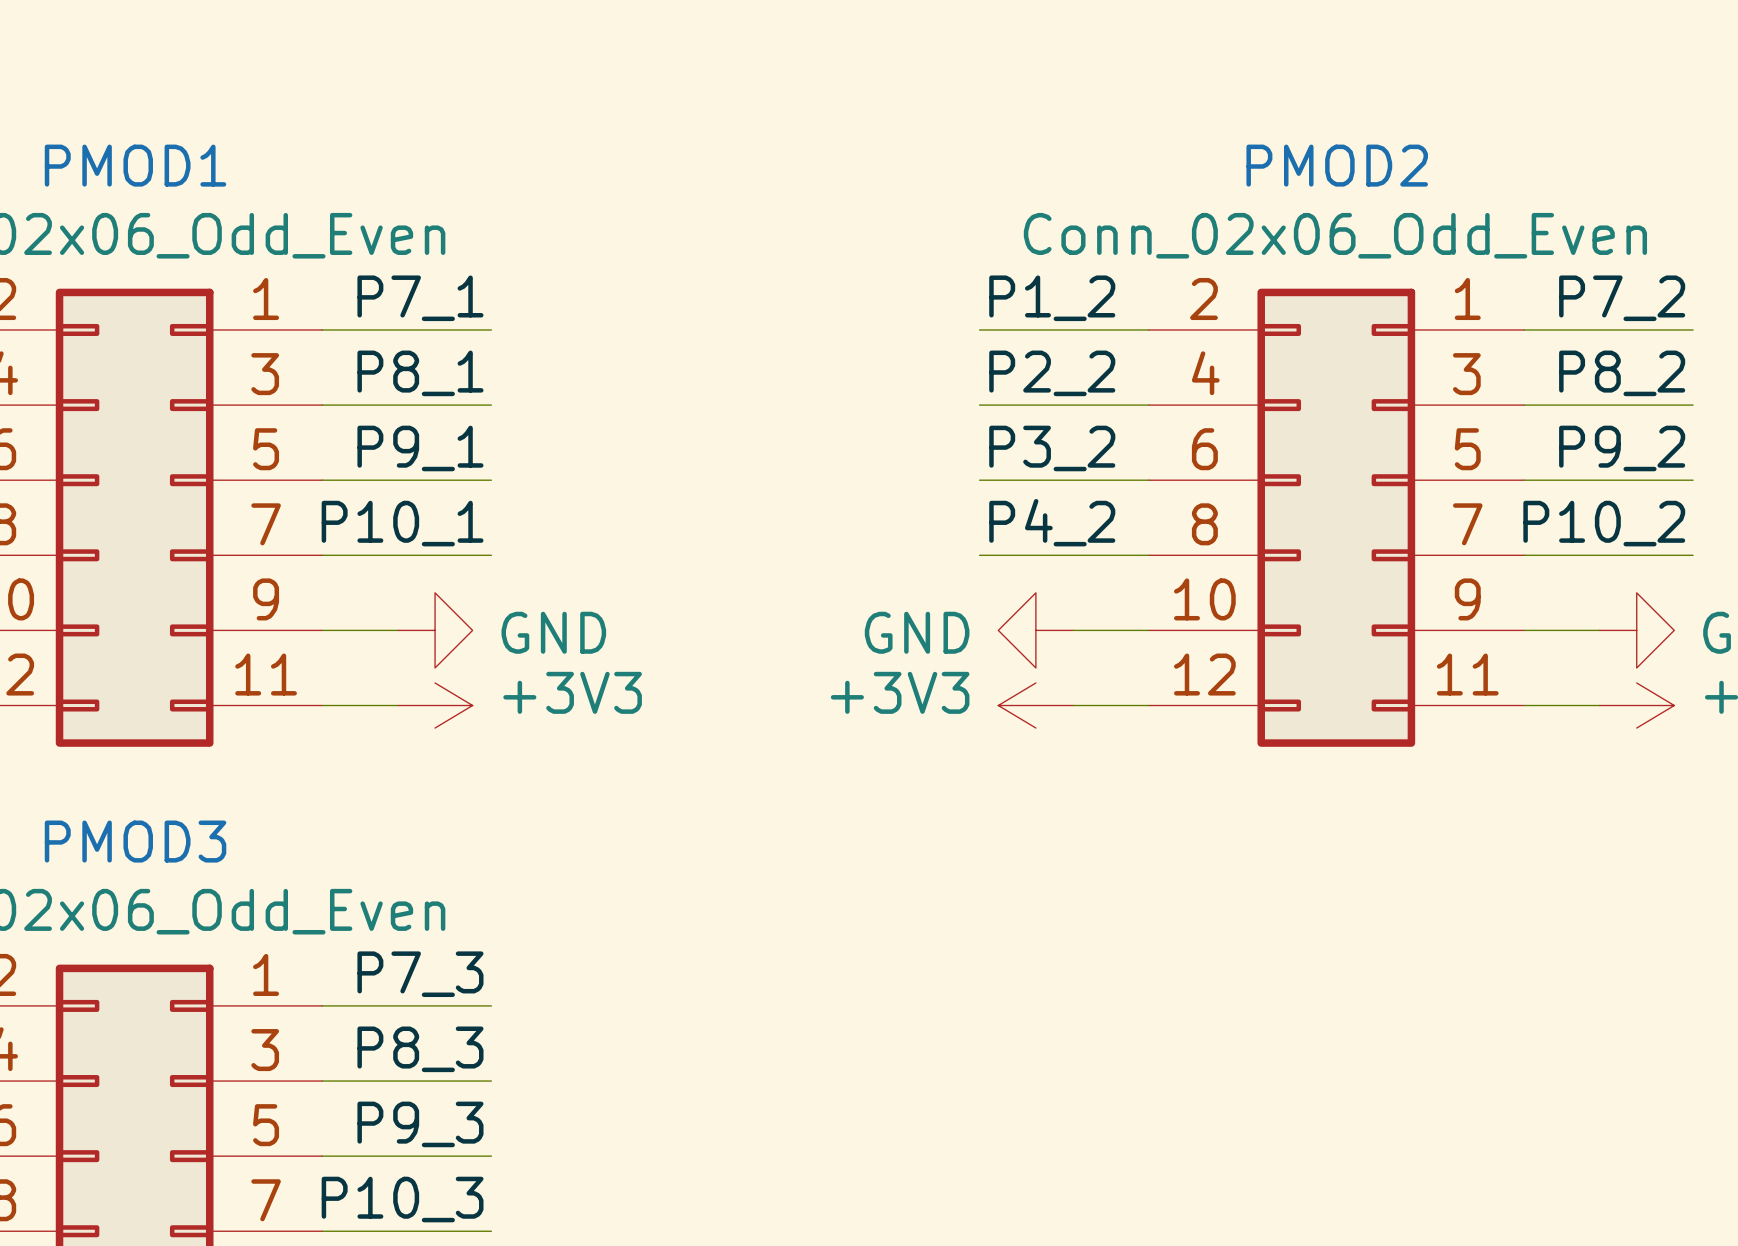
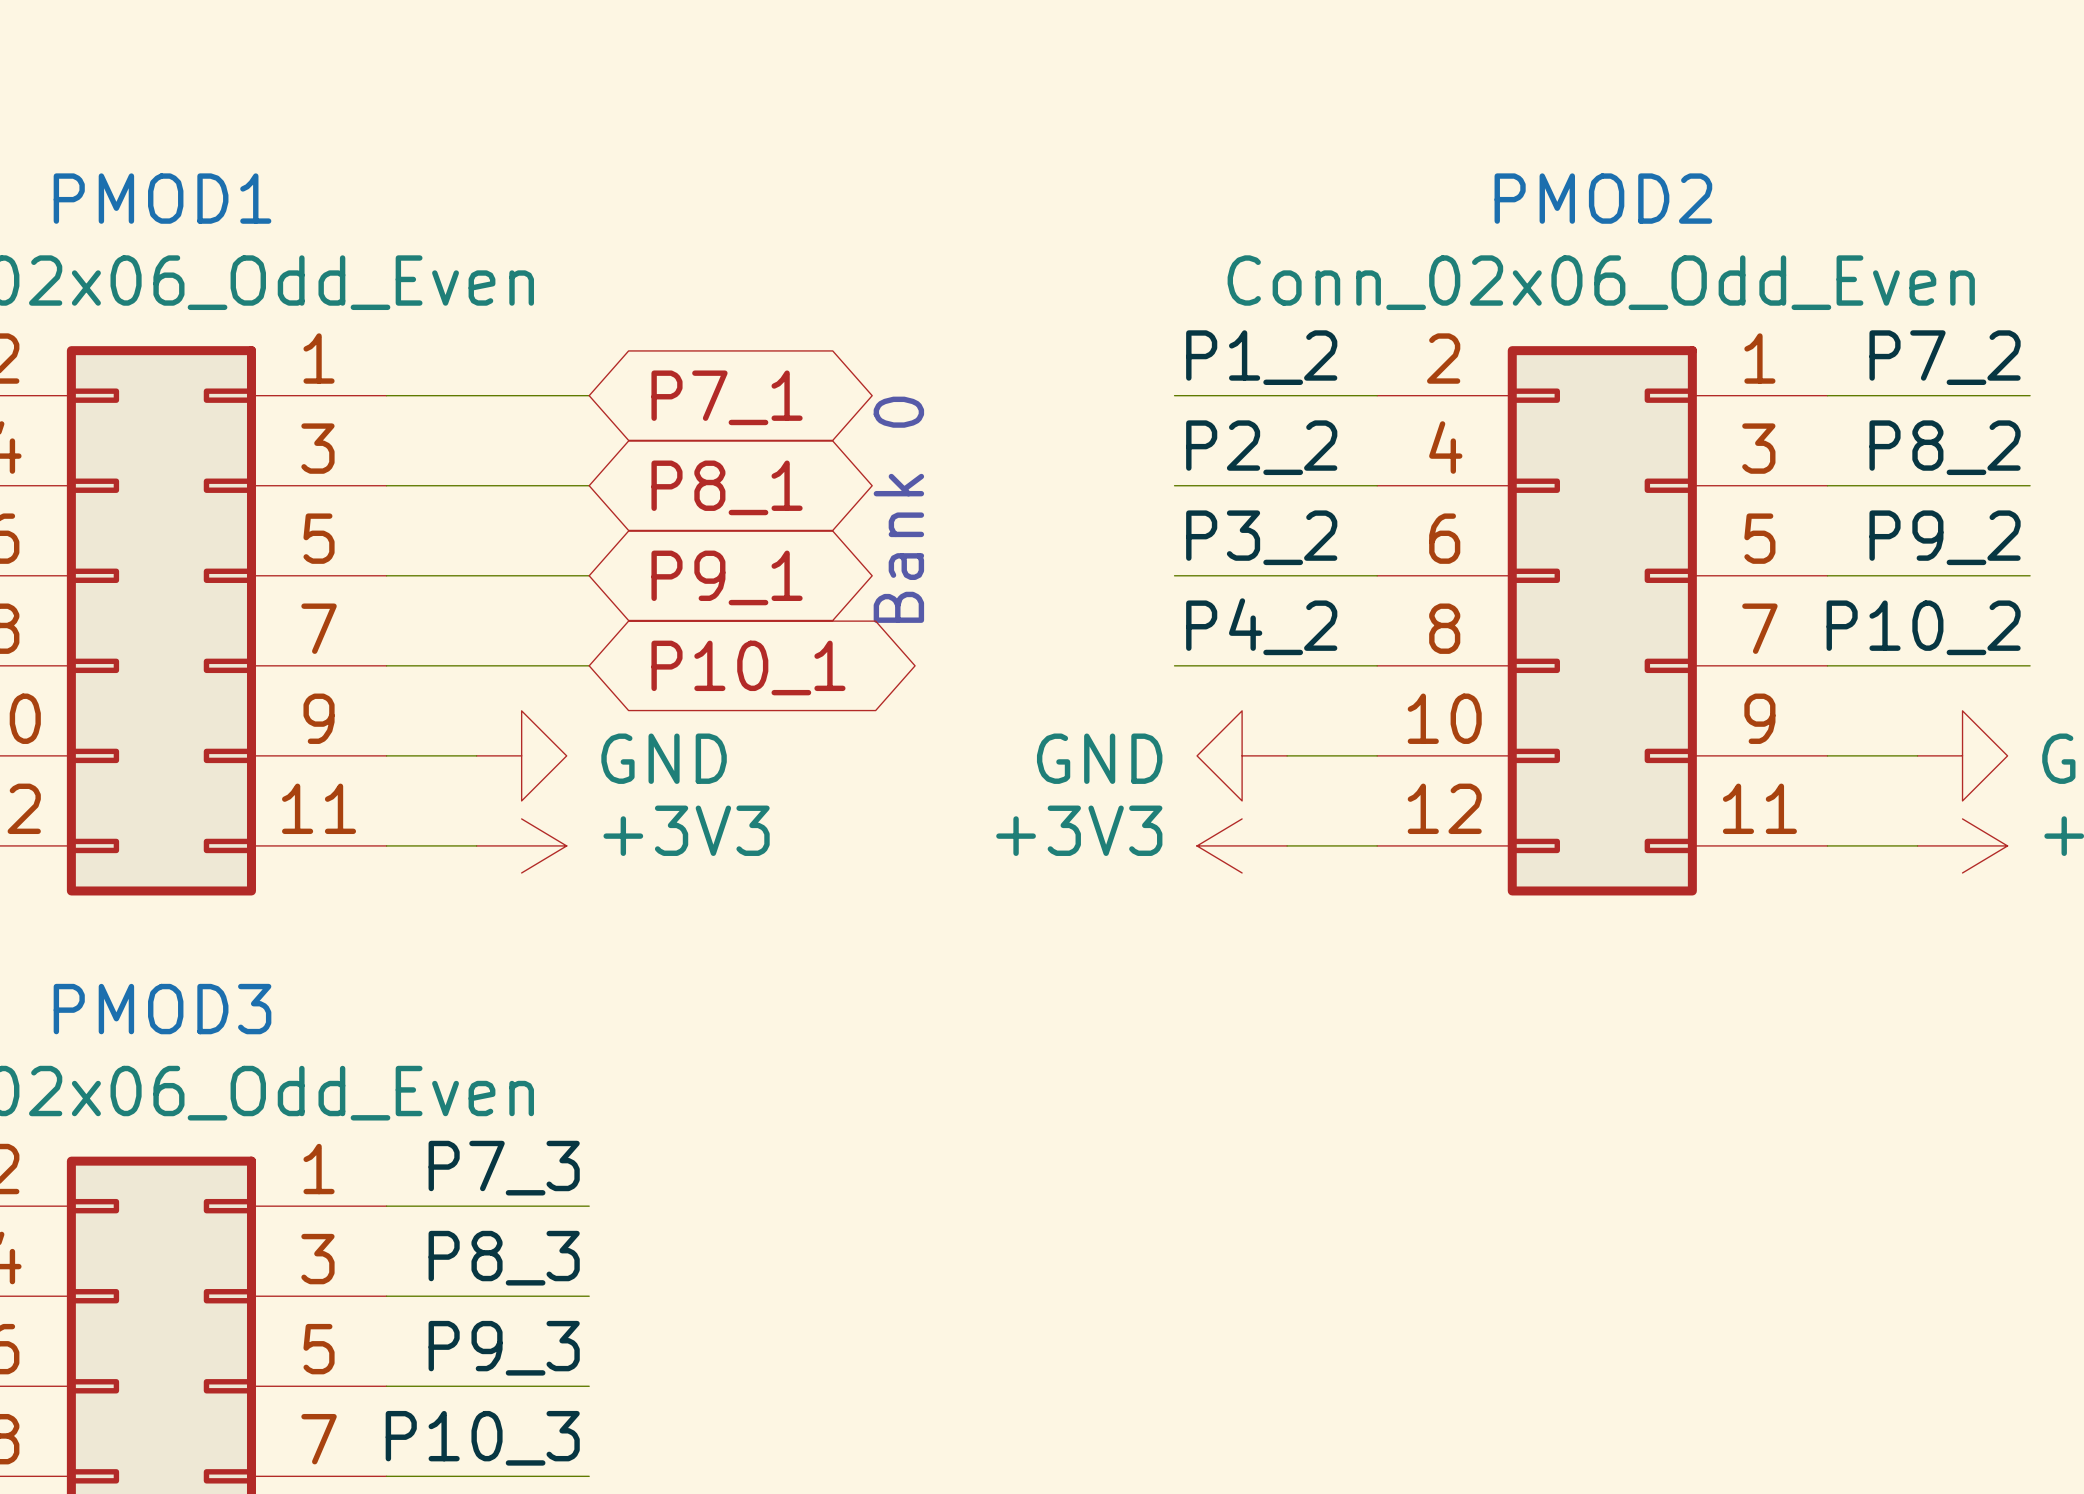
label: P7_1 (420, 298) -> none
global label: none -> P7_1 (727, 397)
label: P8_1 (420, 373) -> none
global label: none -> P8_1 (727, 487)
text: none -> Bank 0 (898, 509)
label: P9_1 (420, 448) -> none
global label: none -> P9_1 (727, 577)
label: P10_1 (402, 523) -> none
global label: none -> P10_1 (748, 667)

